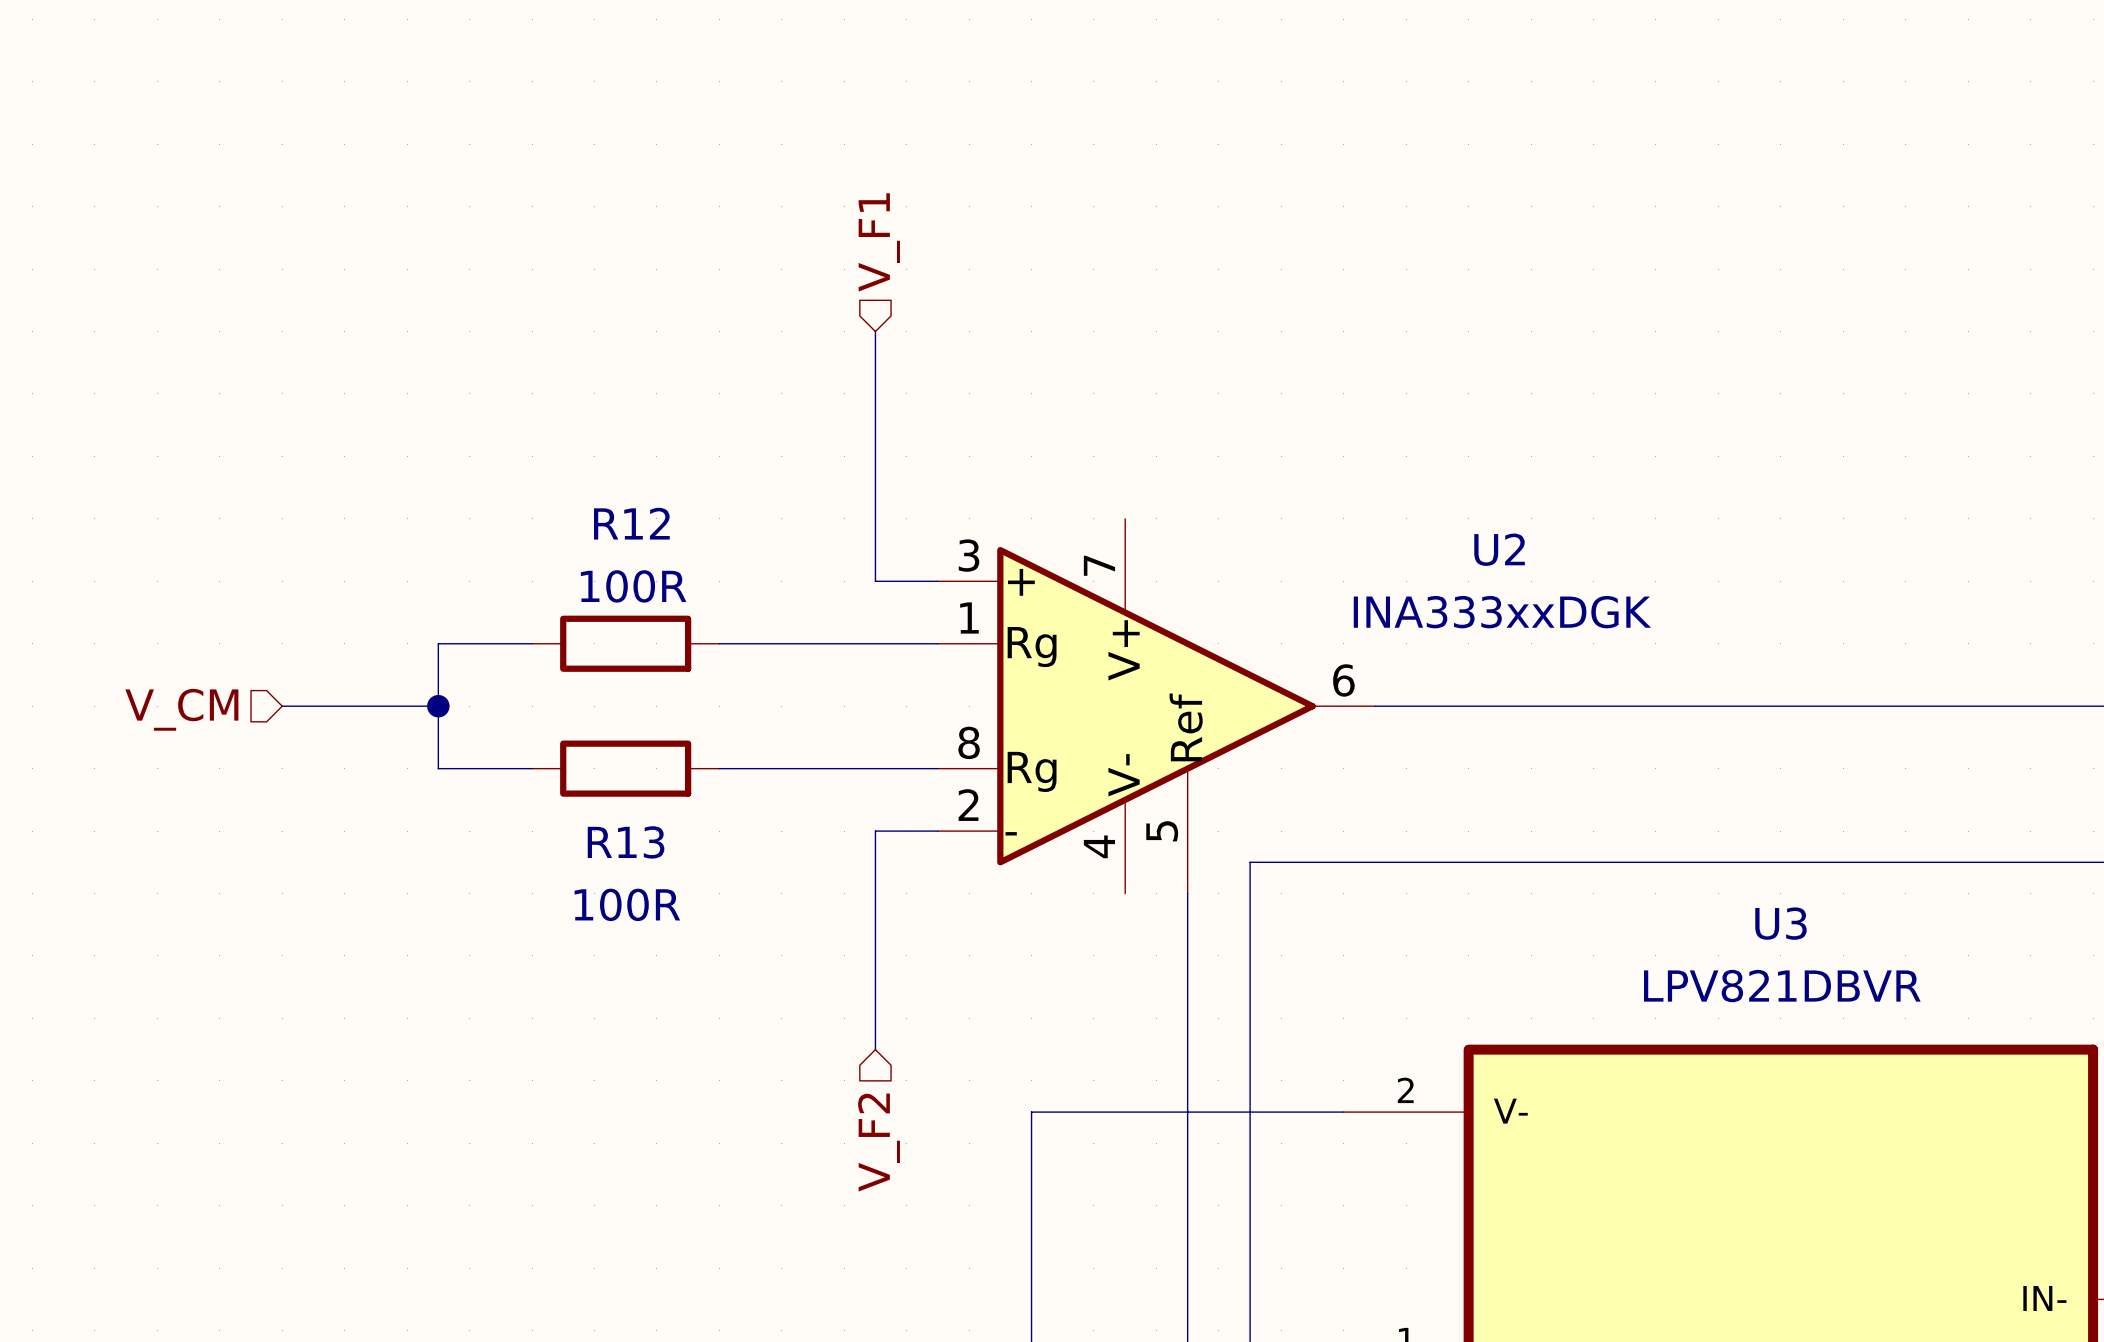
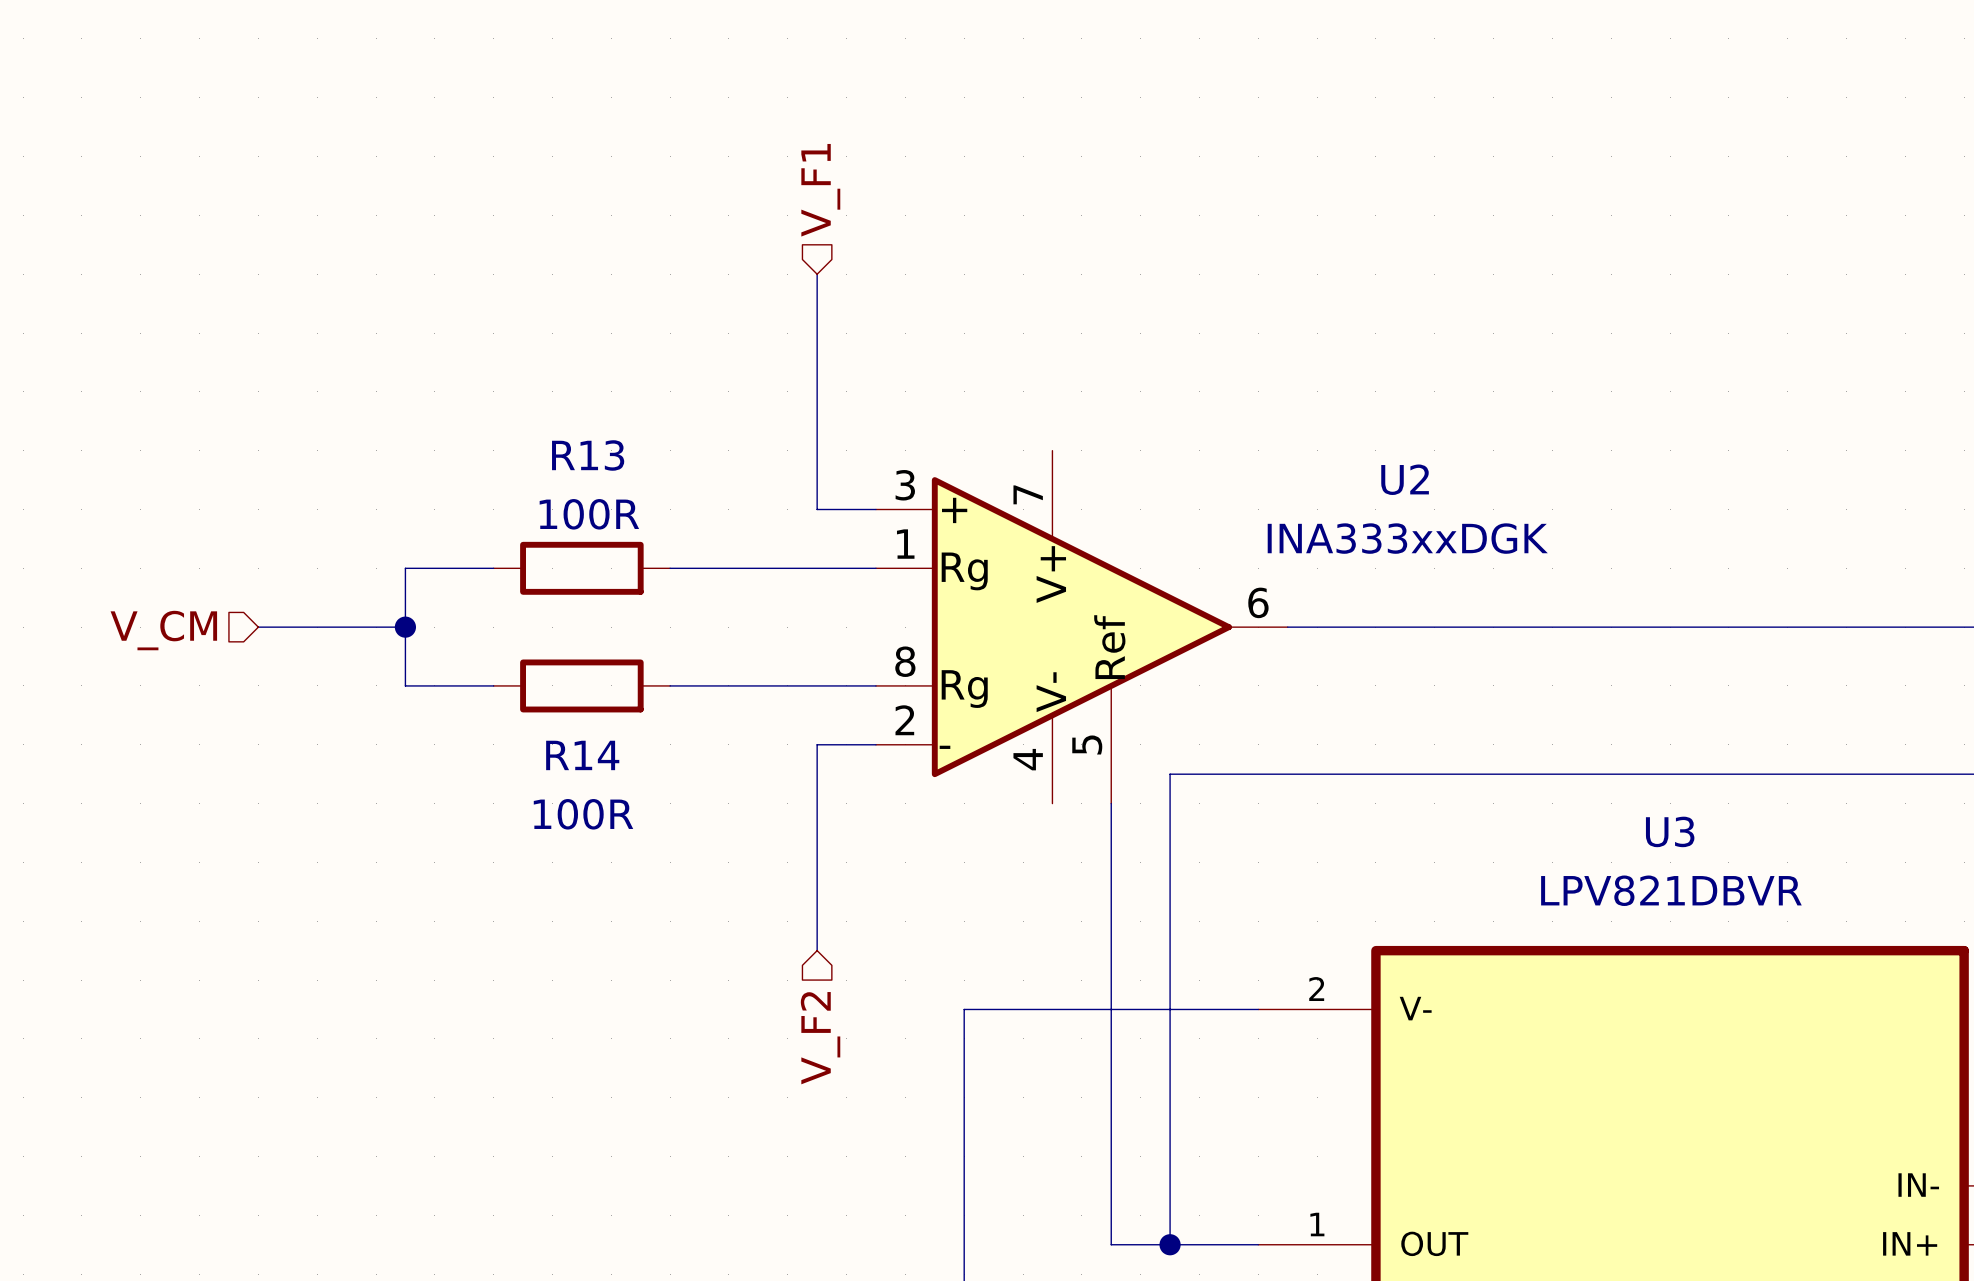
R12 name: R12 (631, 523) -> R13 (588, 455)
R13 name: R13 (626, 842) -> R14 (582, 755)

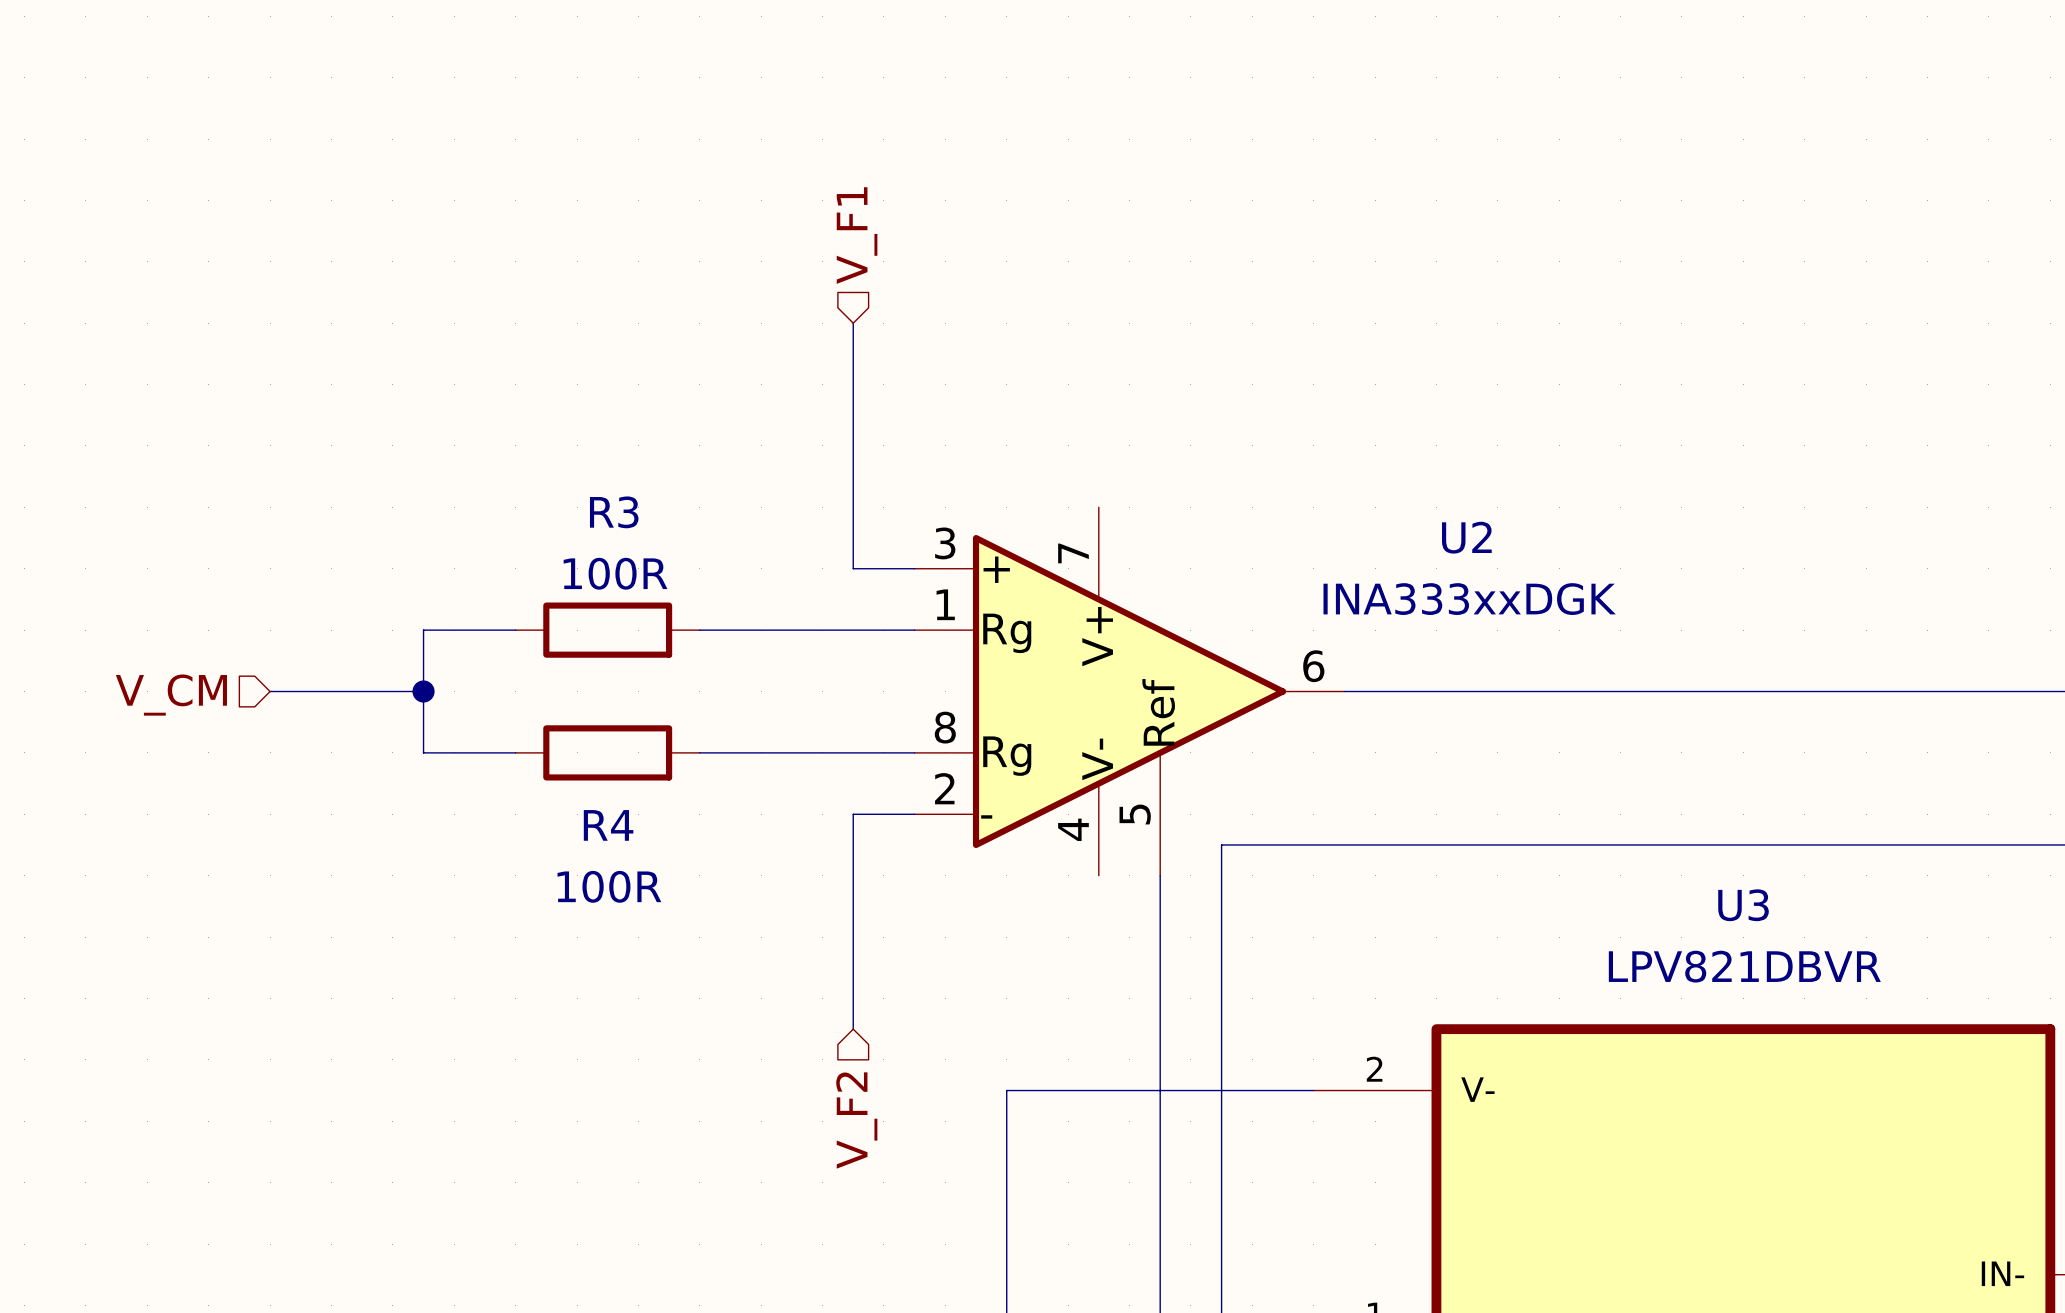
R13 name: R13 (588, 455) -> R3 (614, 512)
R14 name: R14 (582, 755) -> R4 (608, 825)

